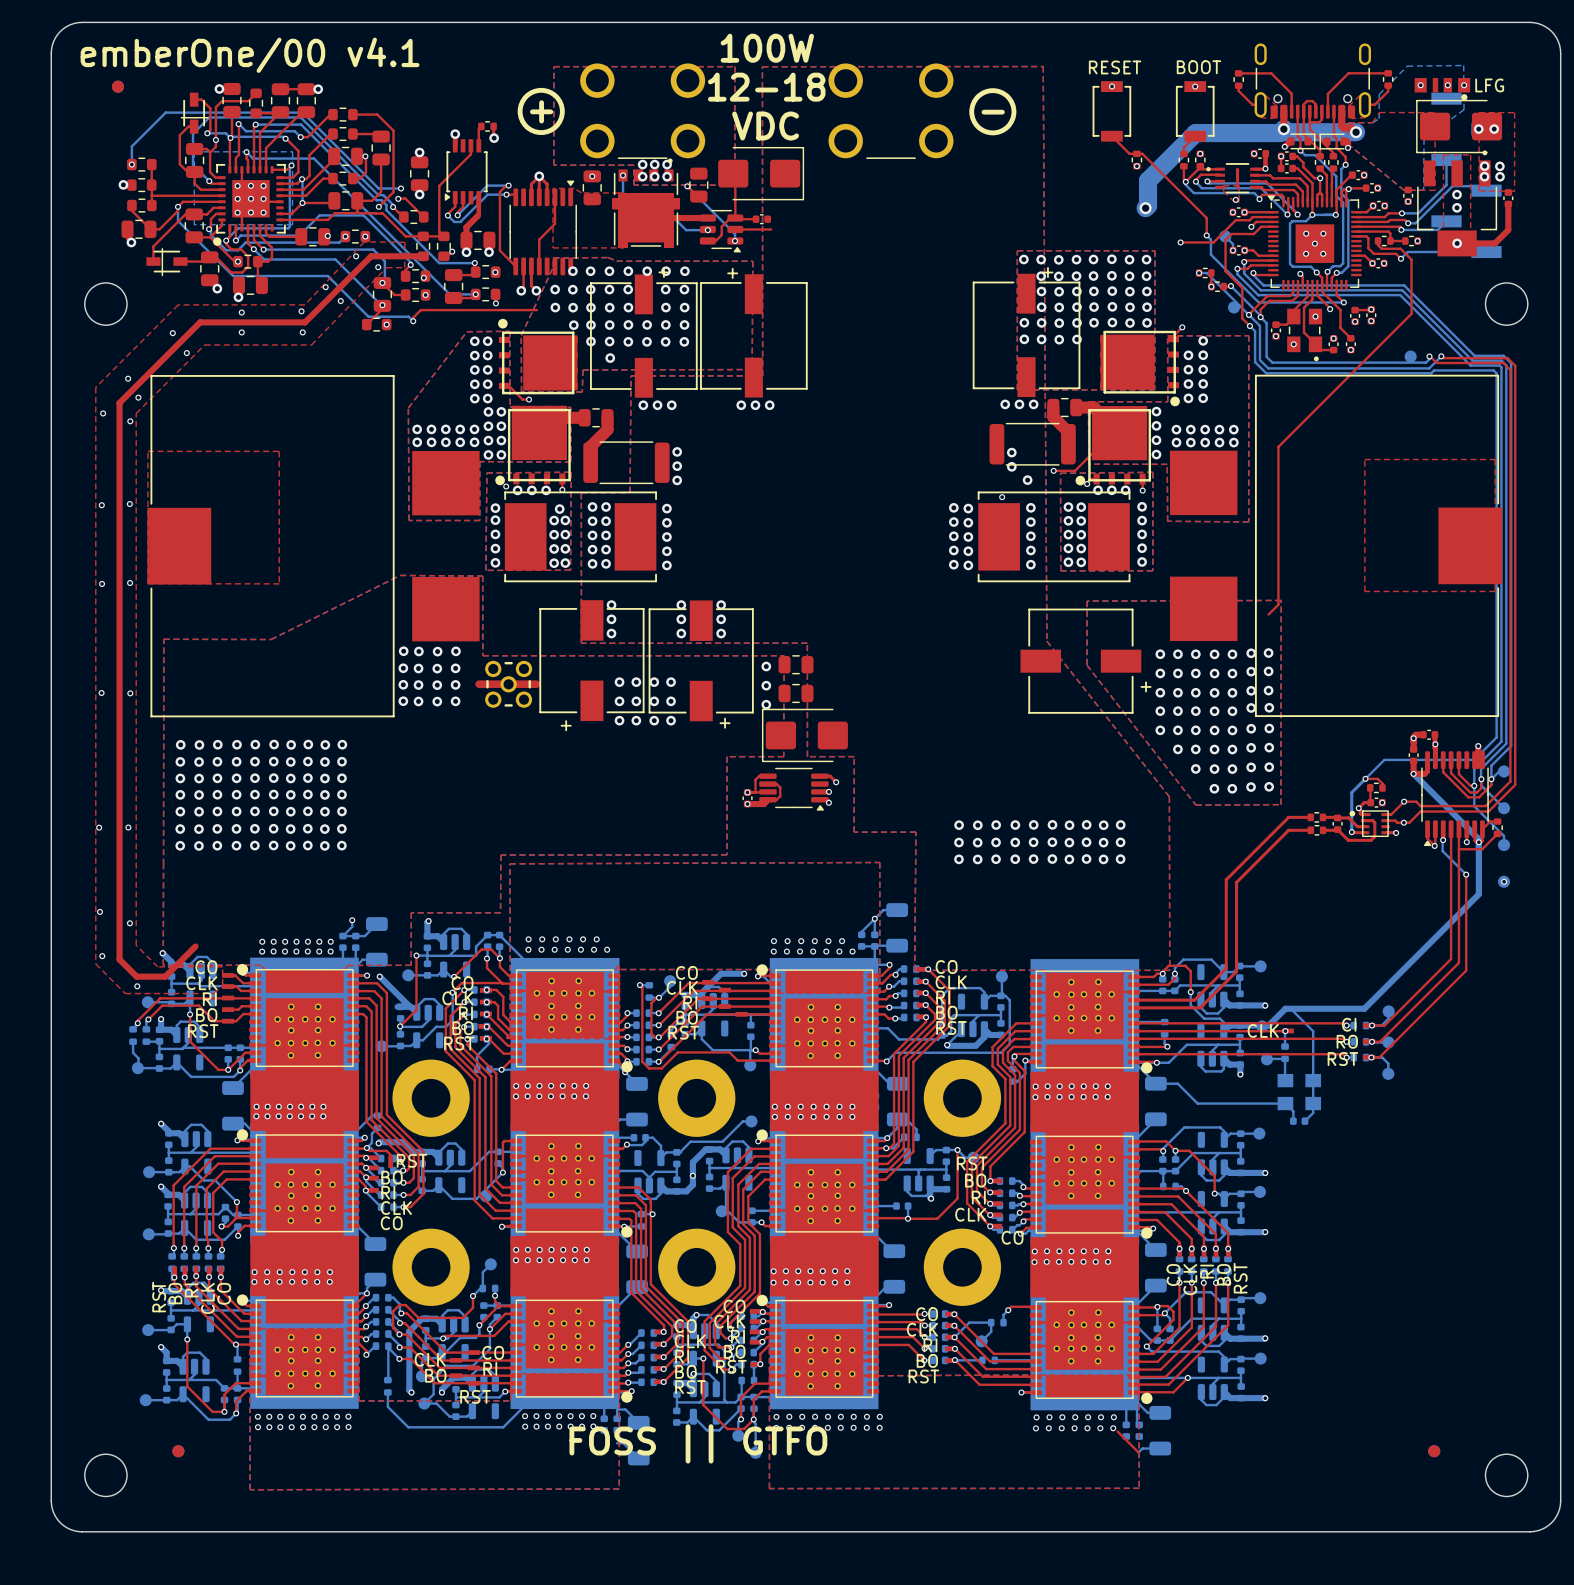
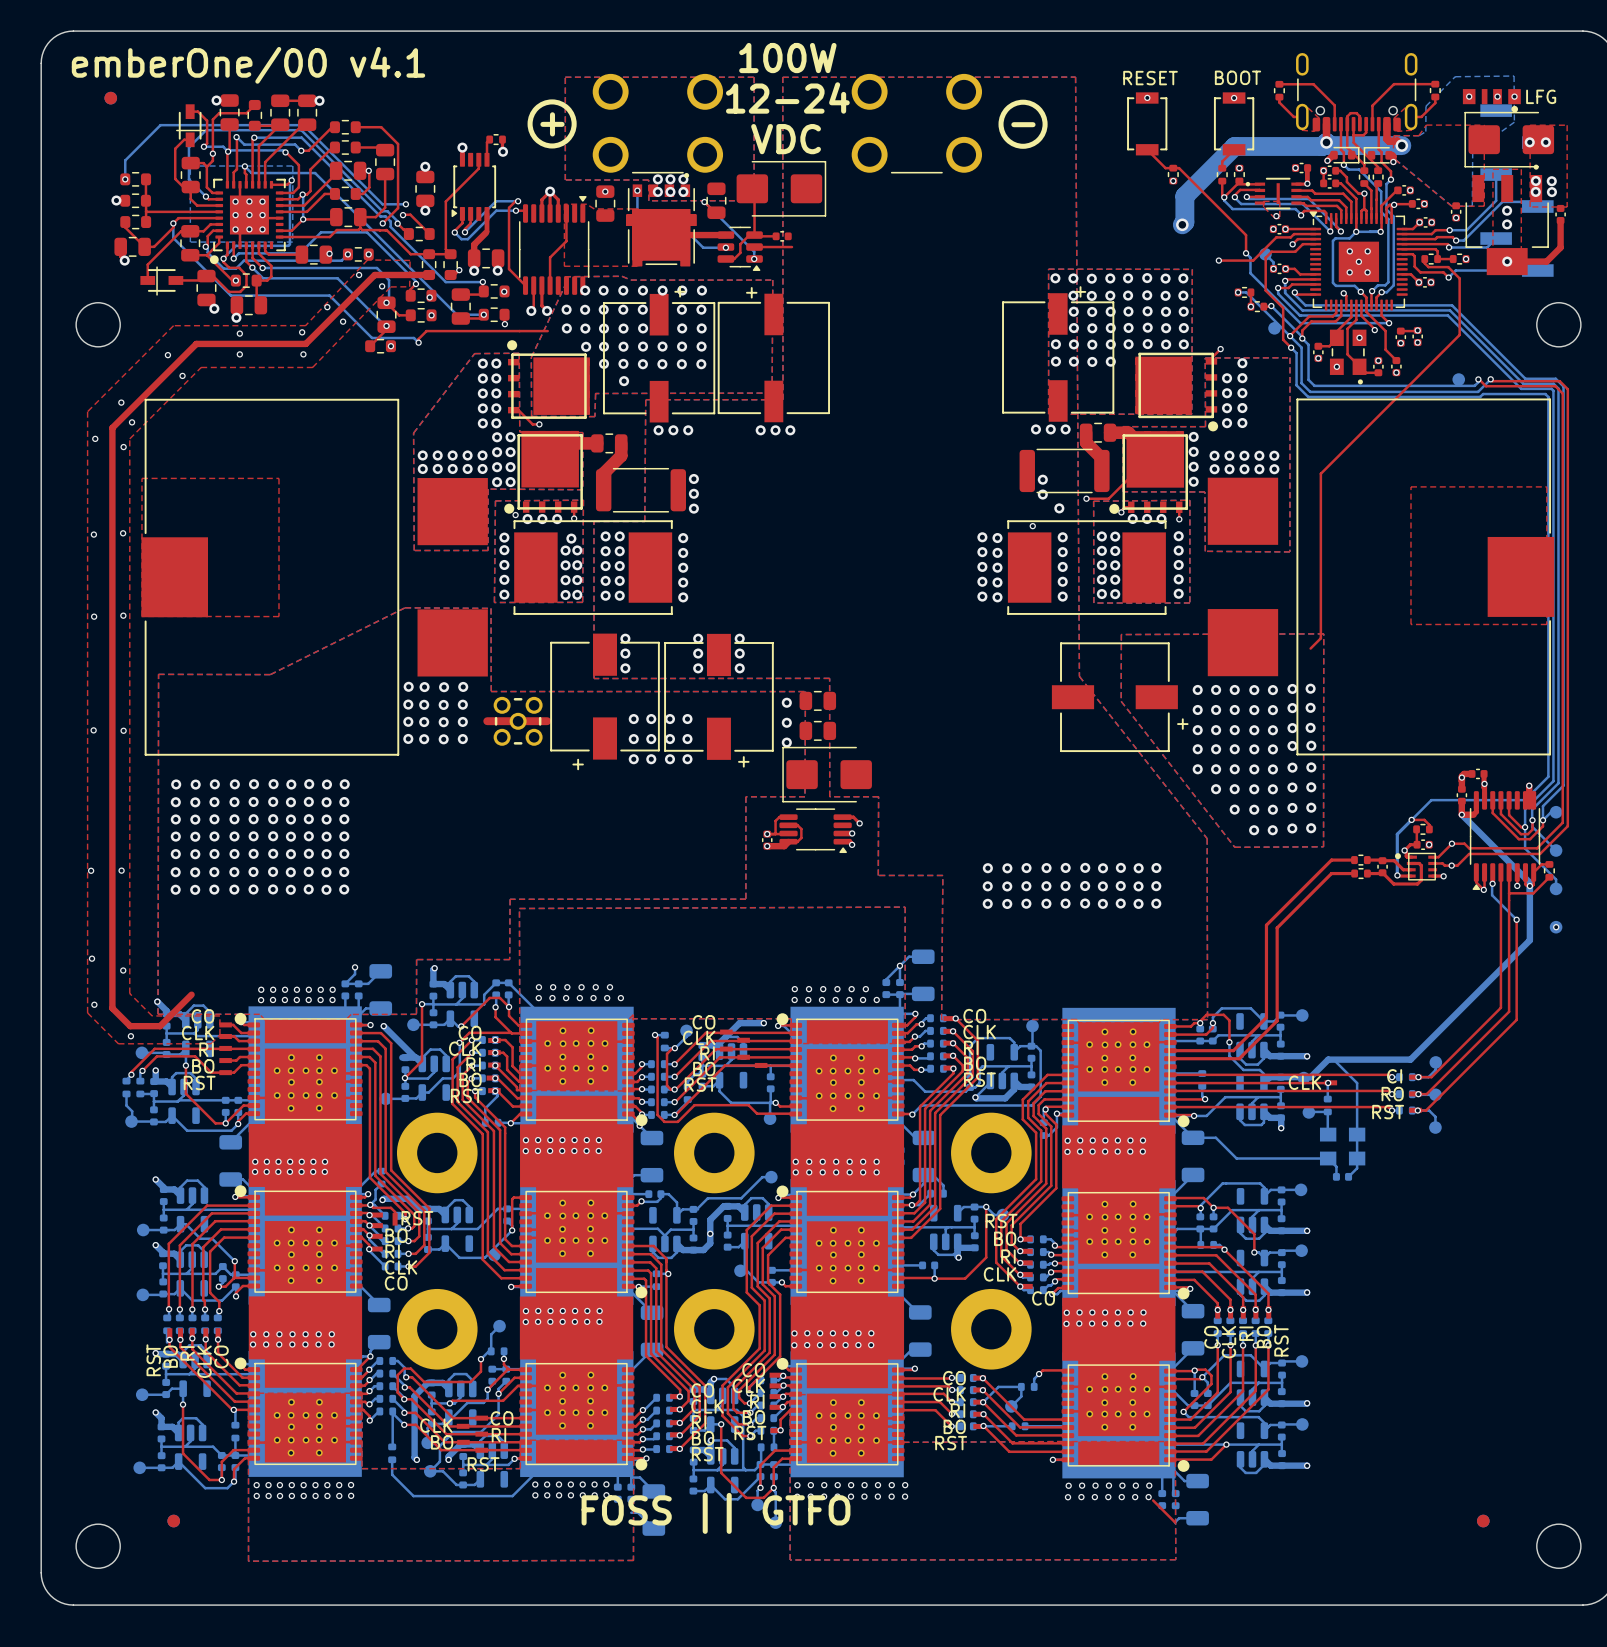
text: 12-18 (766, 87) -> 12-24 (787, 97)

